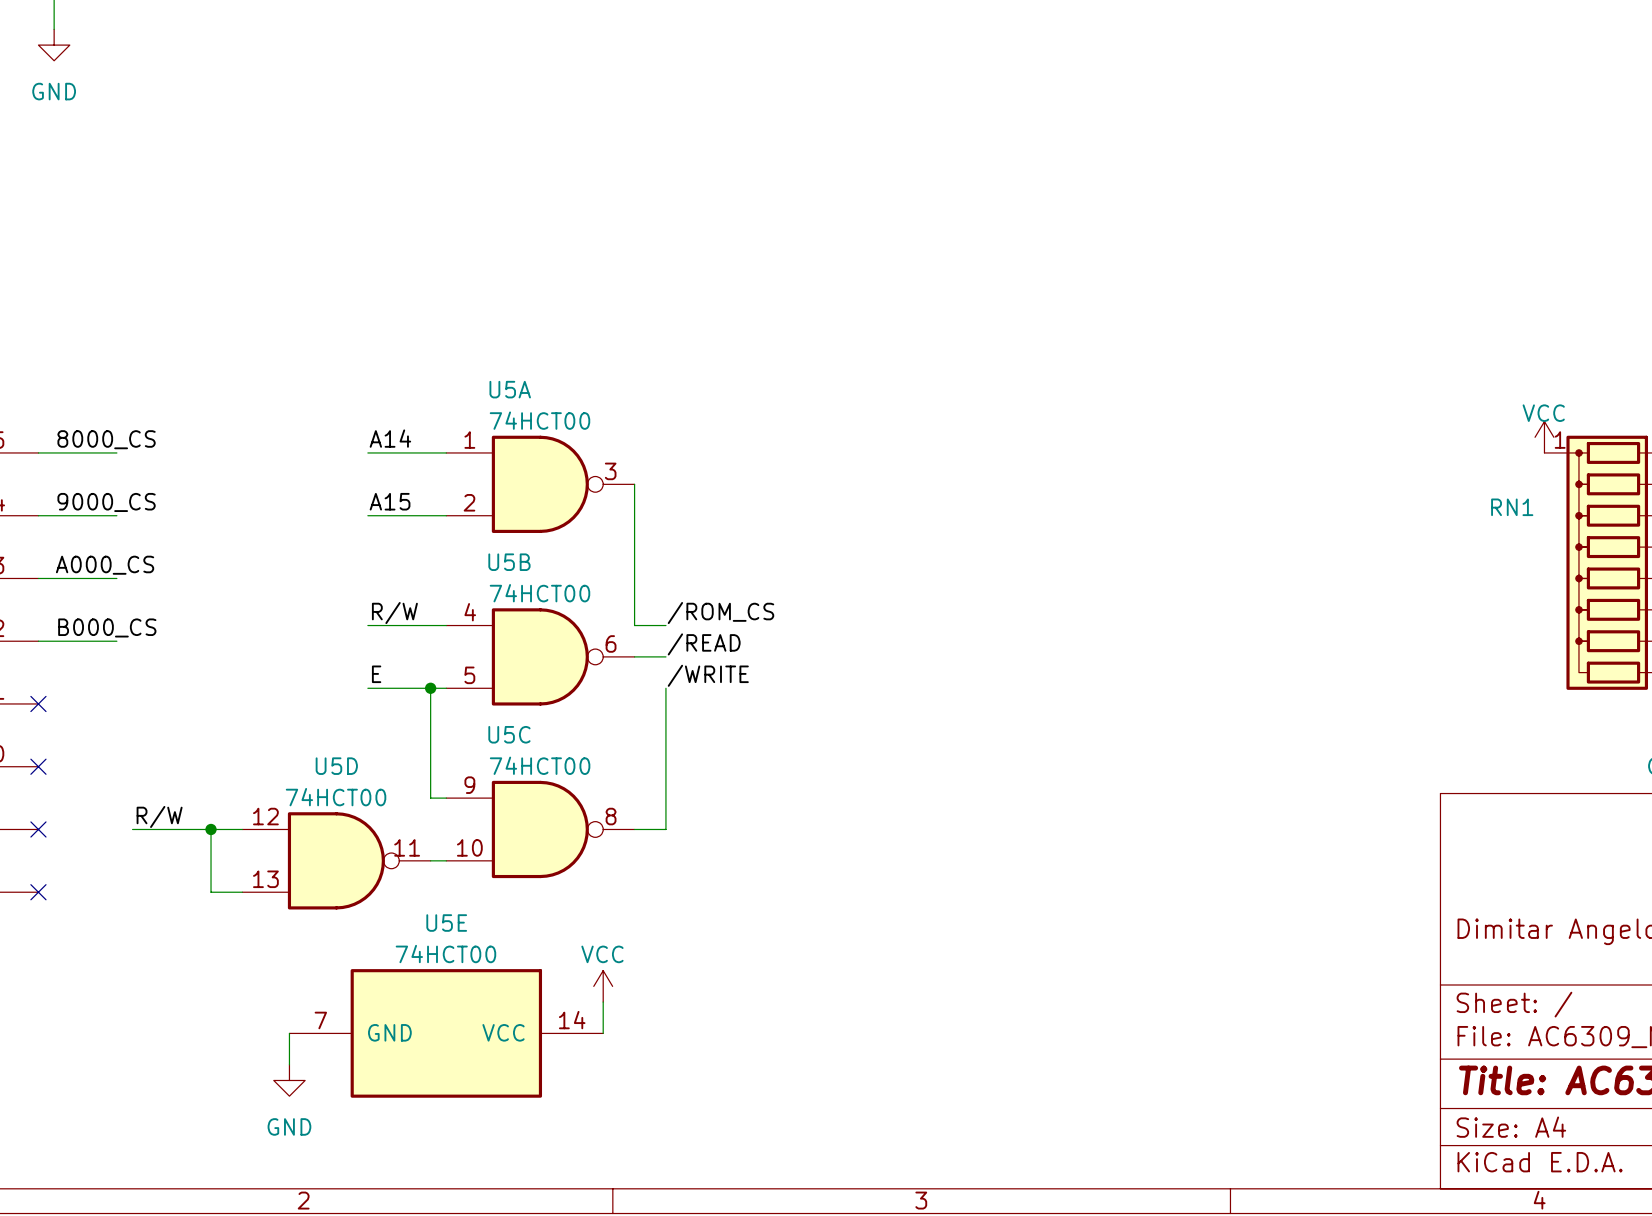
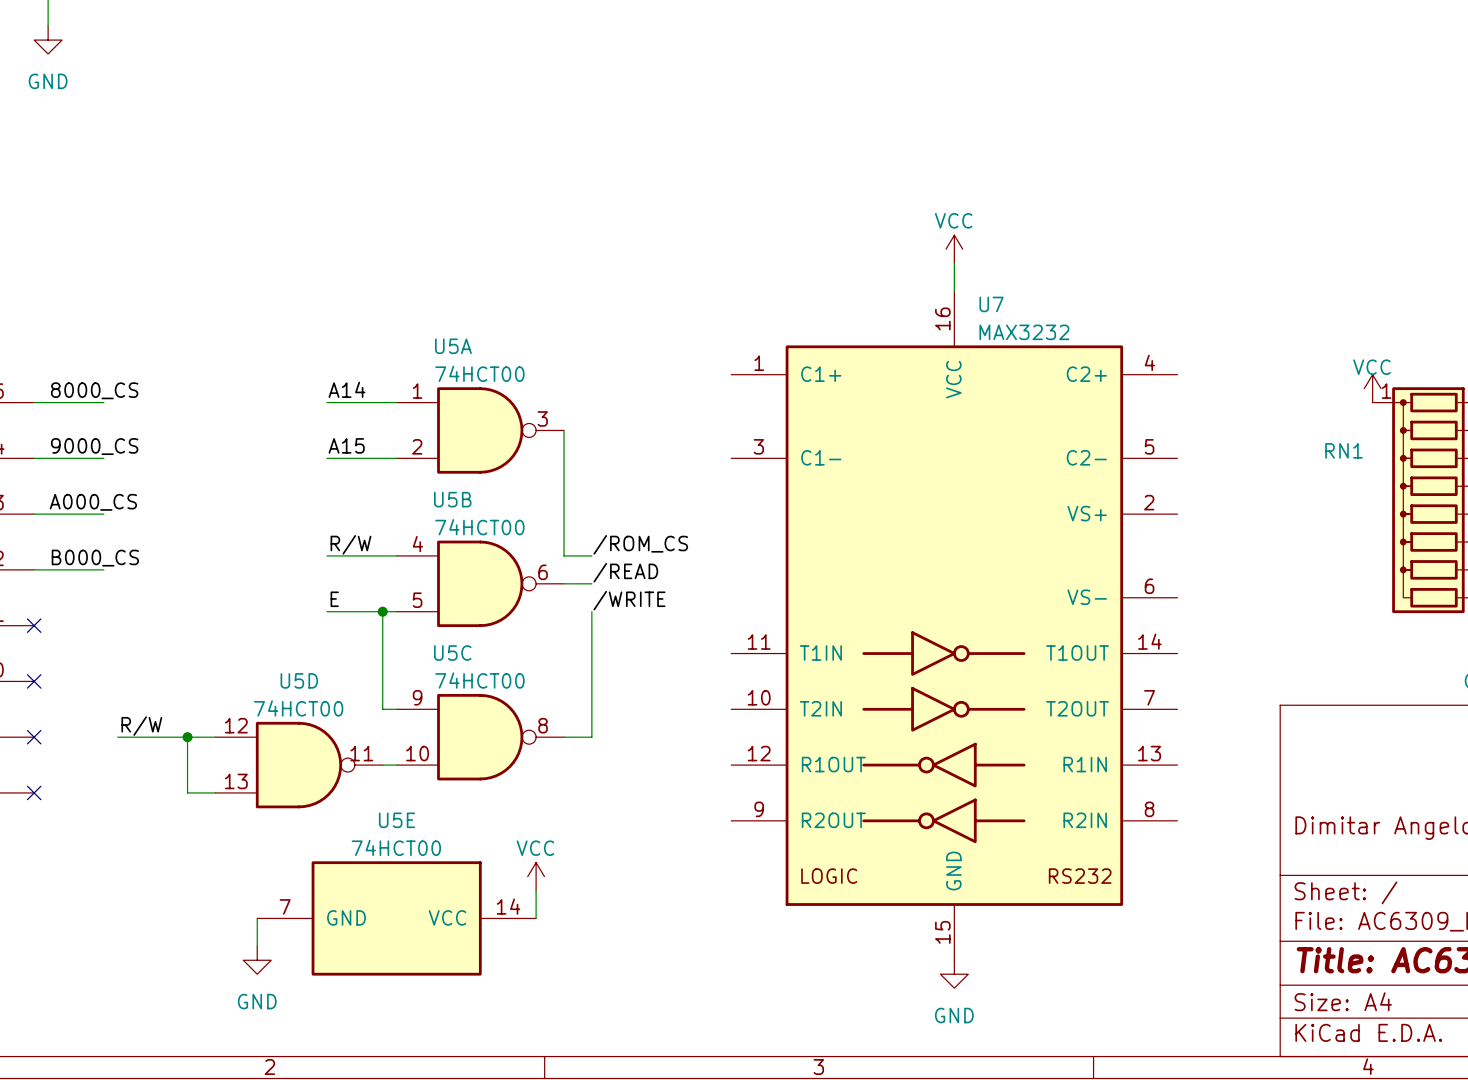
power symbol: none -> VCC (954, 249)
wire: none -> (954, 263) (954, 291)
U7: none -> MAX3232 (954, 625)
power symbol: none -> GND (954, 974)

